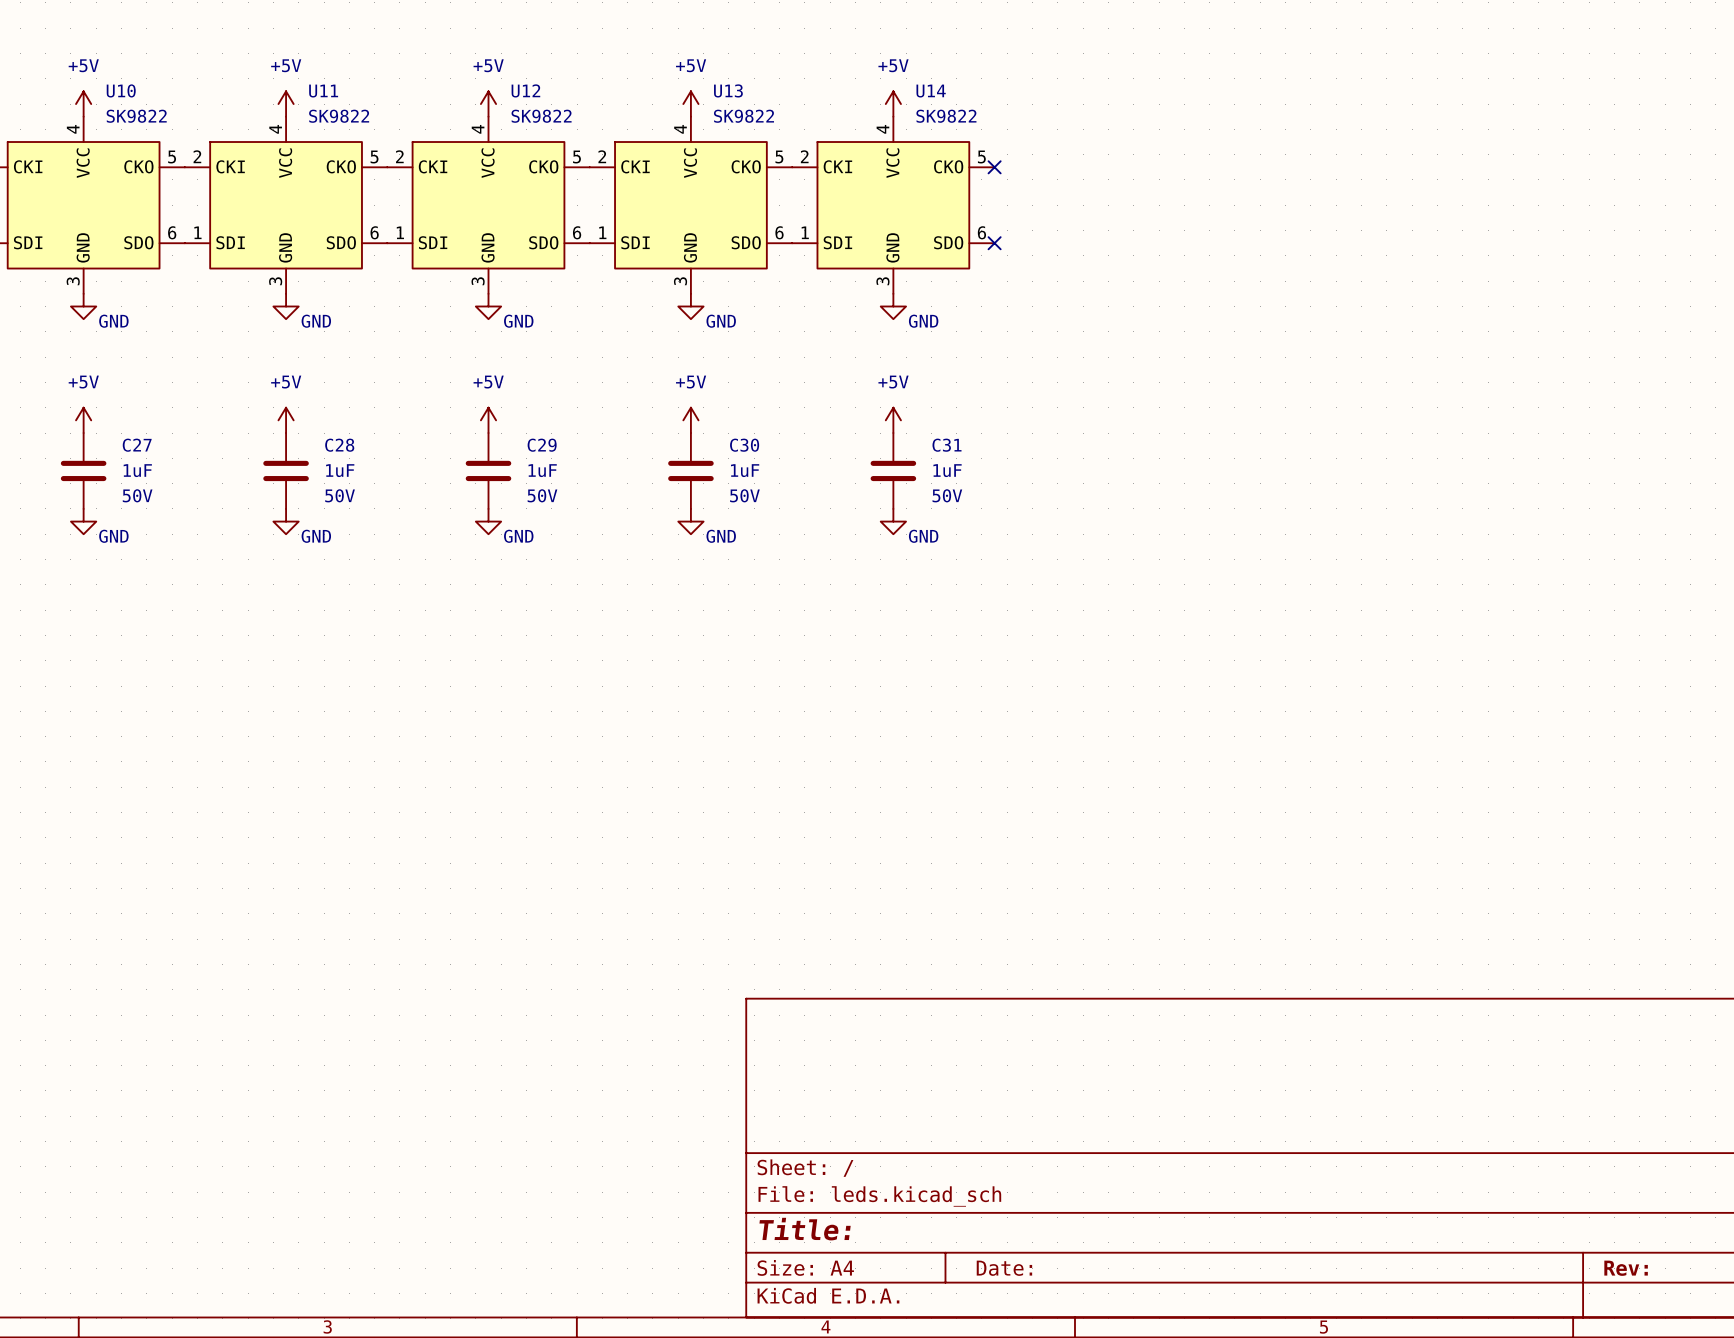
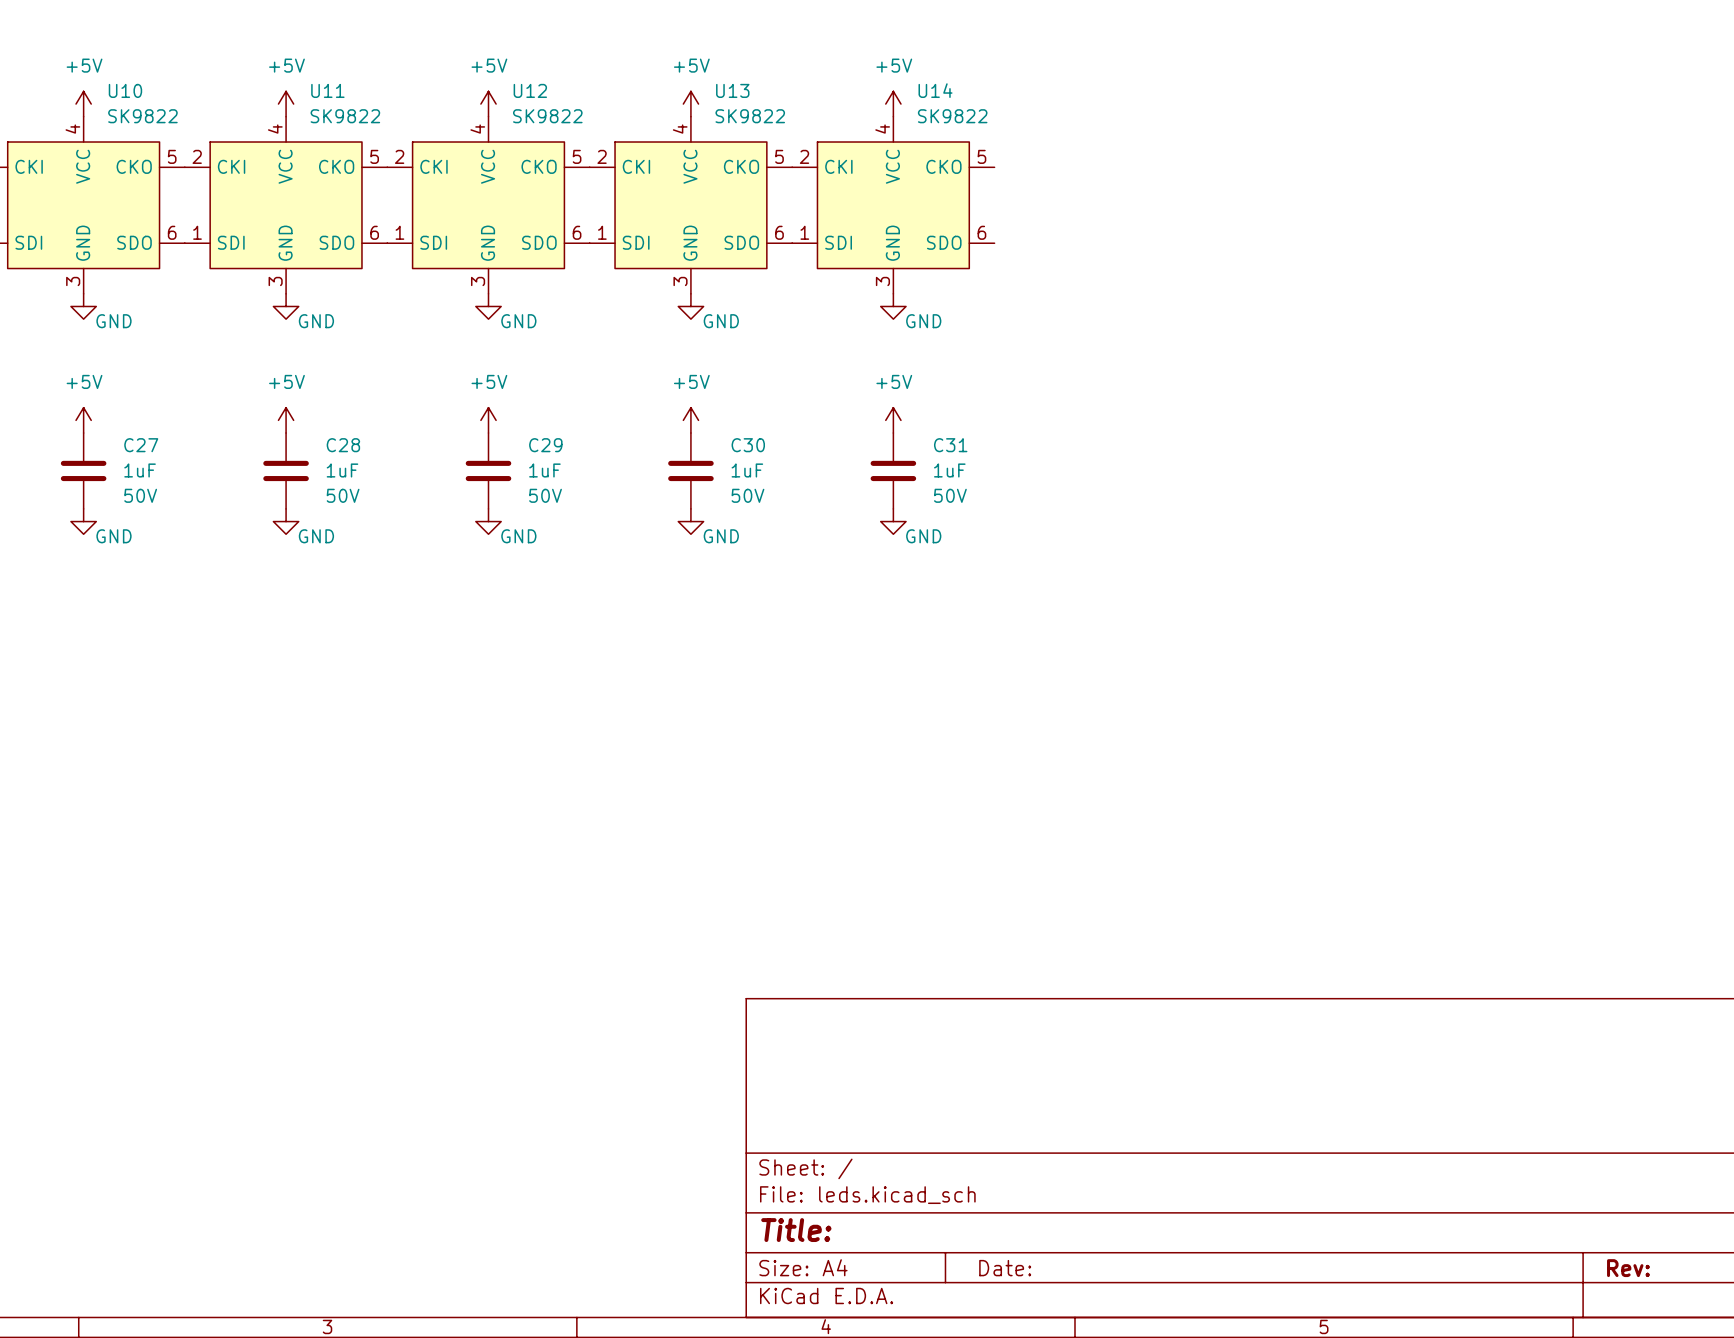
no-connect mark: (994, 167) -> none
no-connect mark: (994, 243) -> none

